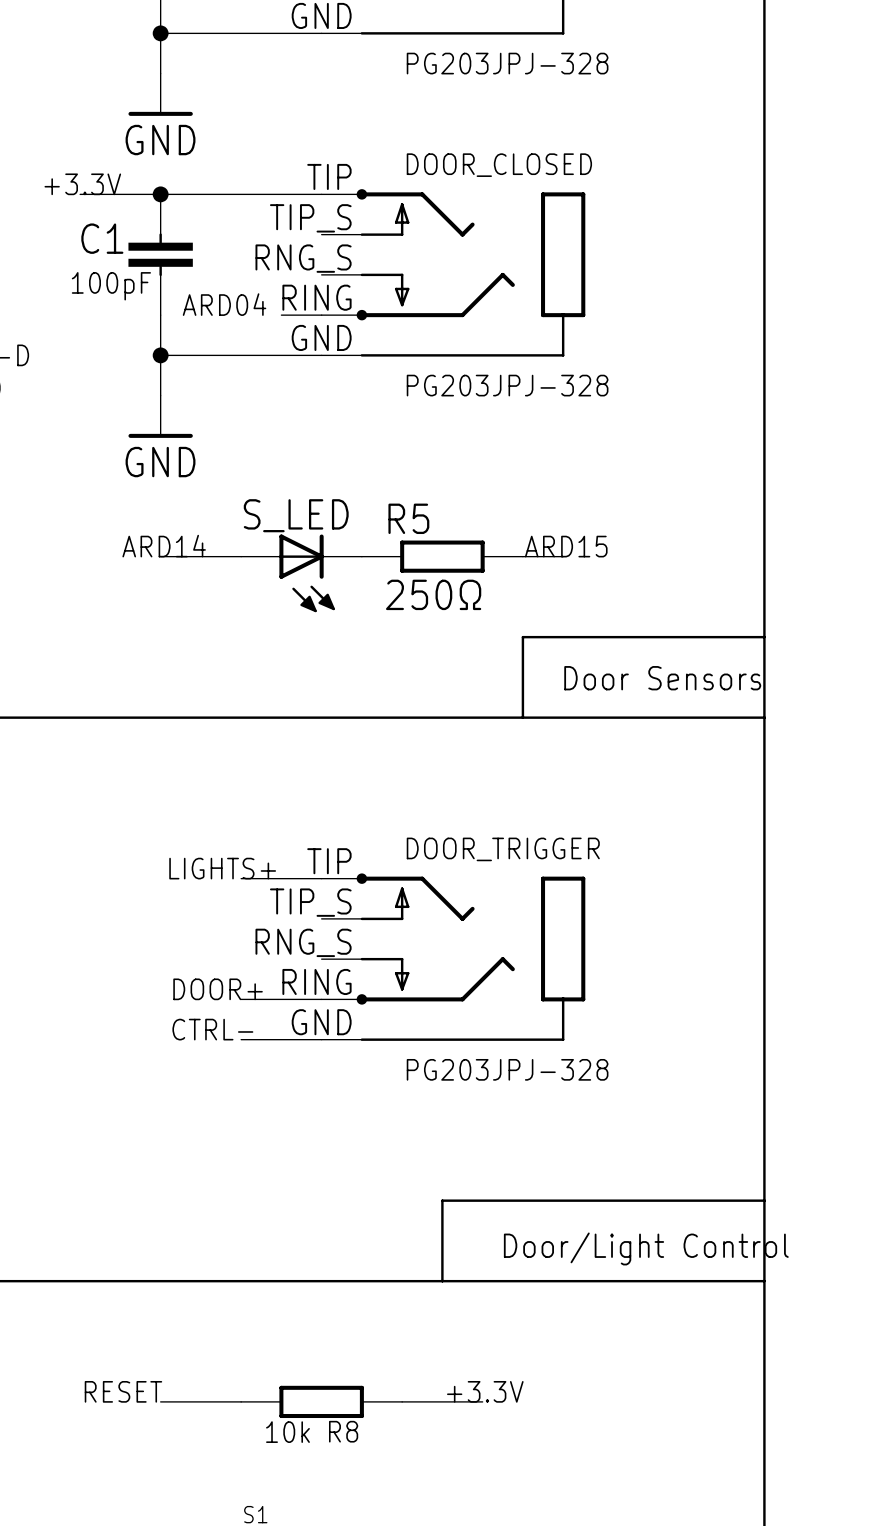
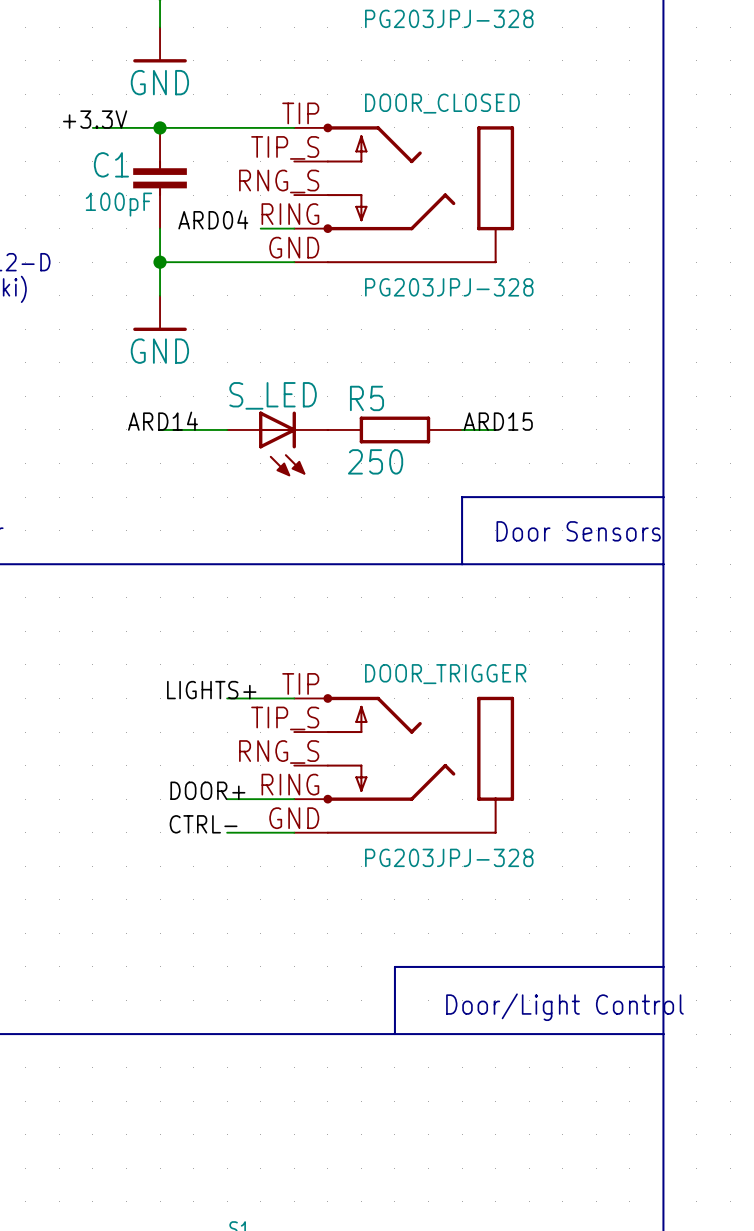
R5 value: 250Ω (433, 594) -> 250 (375, 461)
label: RESET (123, 1391) -> none
label: +3.3V (485, 1391) -> none
wire: (160, 1401) (241, 1401) -> none
R8: 10k (321, 1401) -> none
wire: (402, 1401) (482, 1401) -> none

